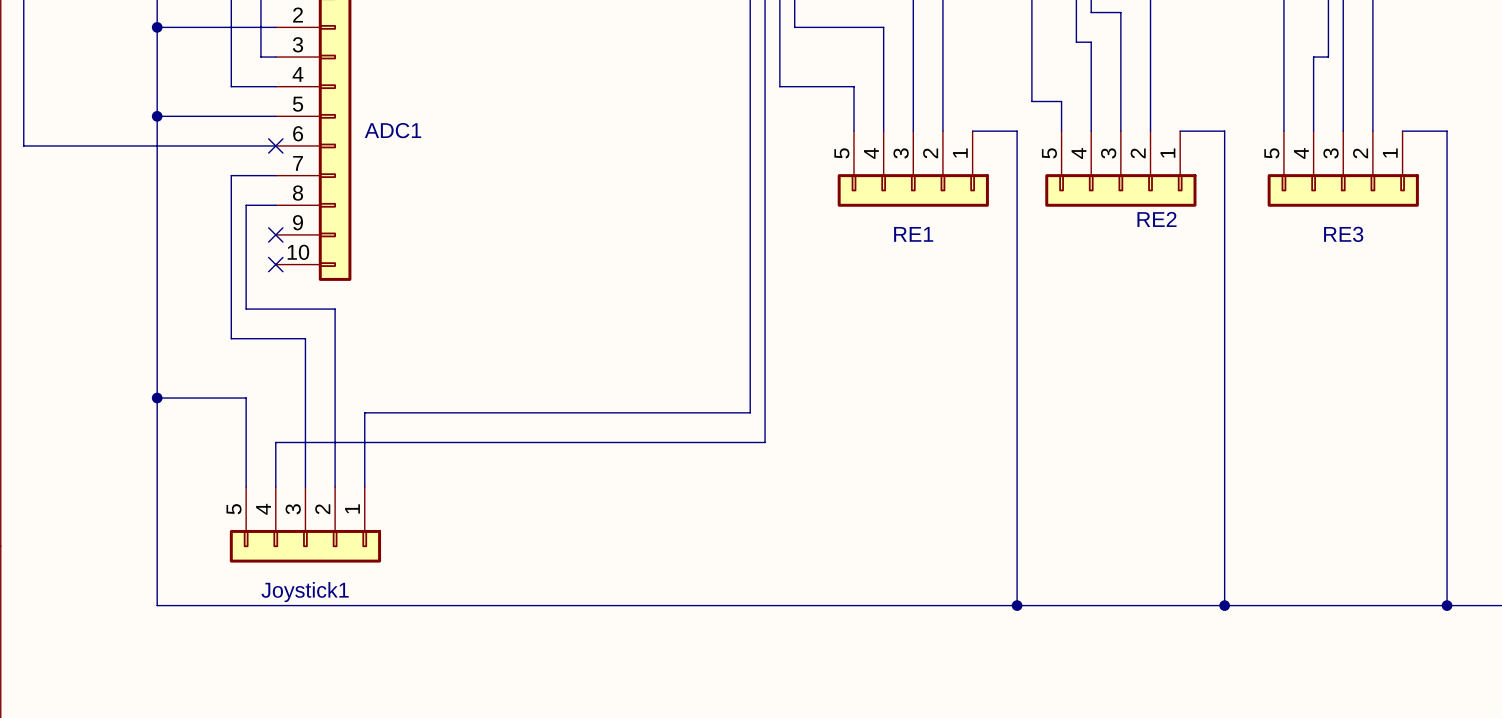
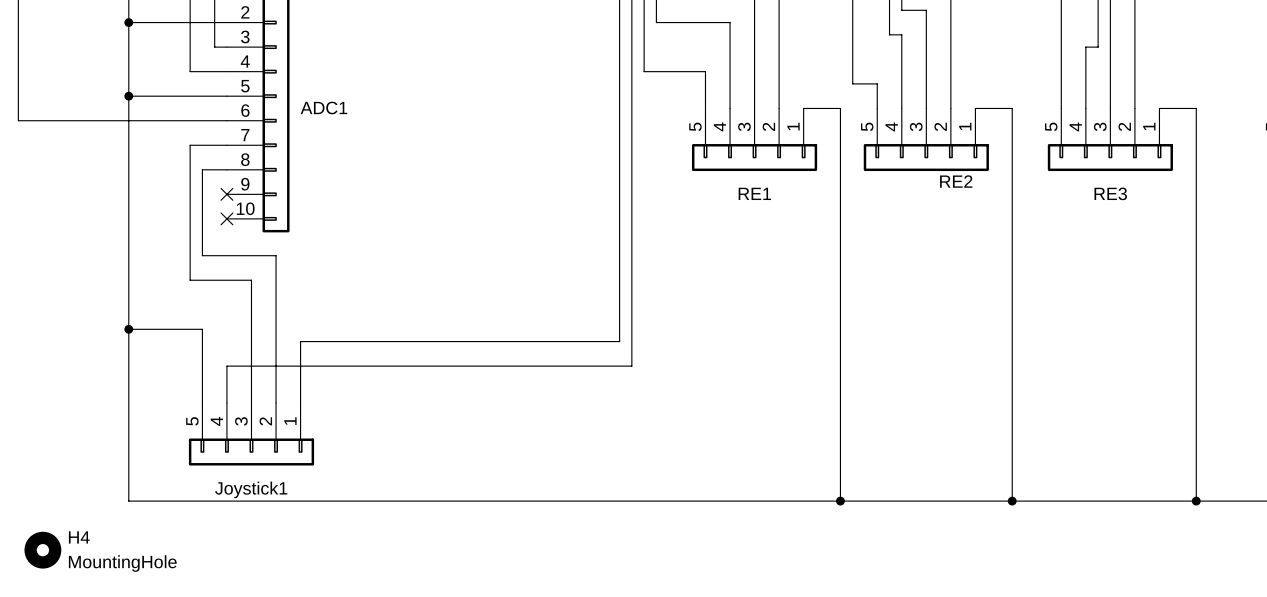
no-connect mark: (275, 145) -> none
H4: none -> MountingHole (42, 550)

